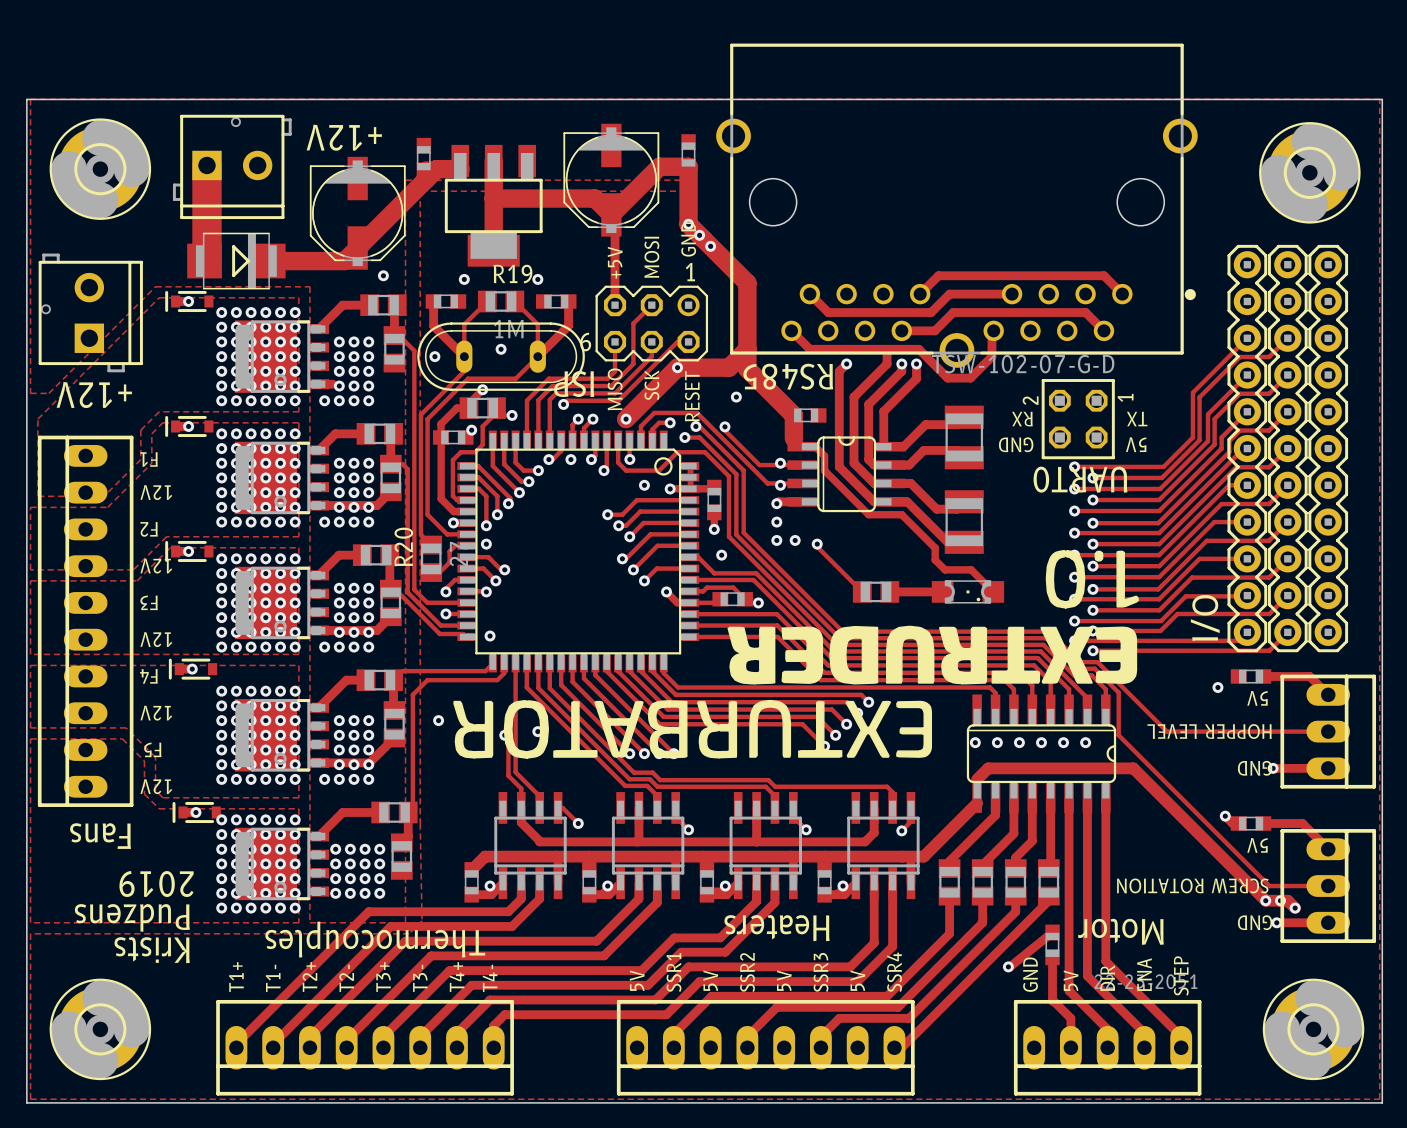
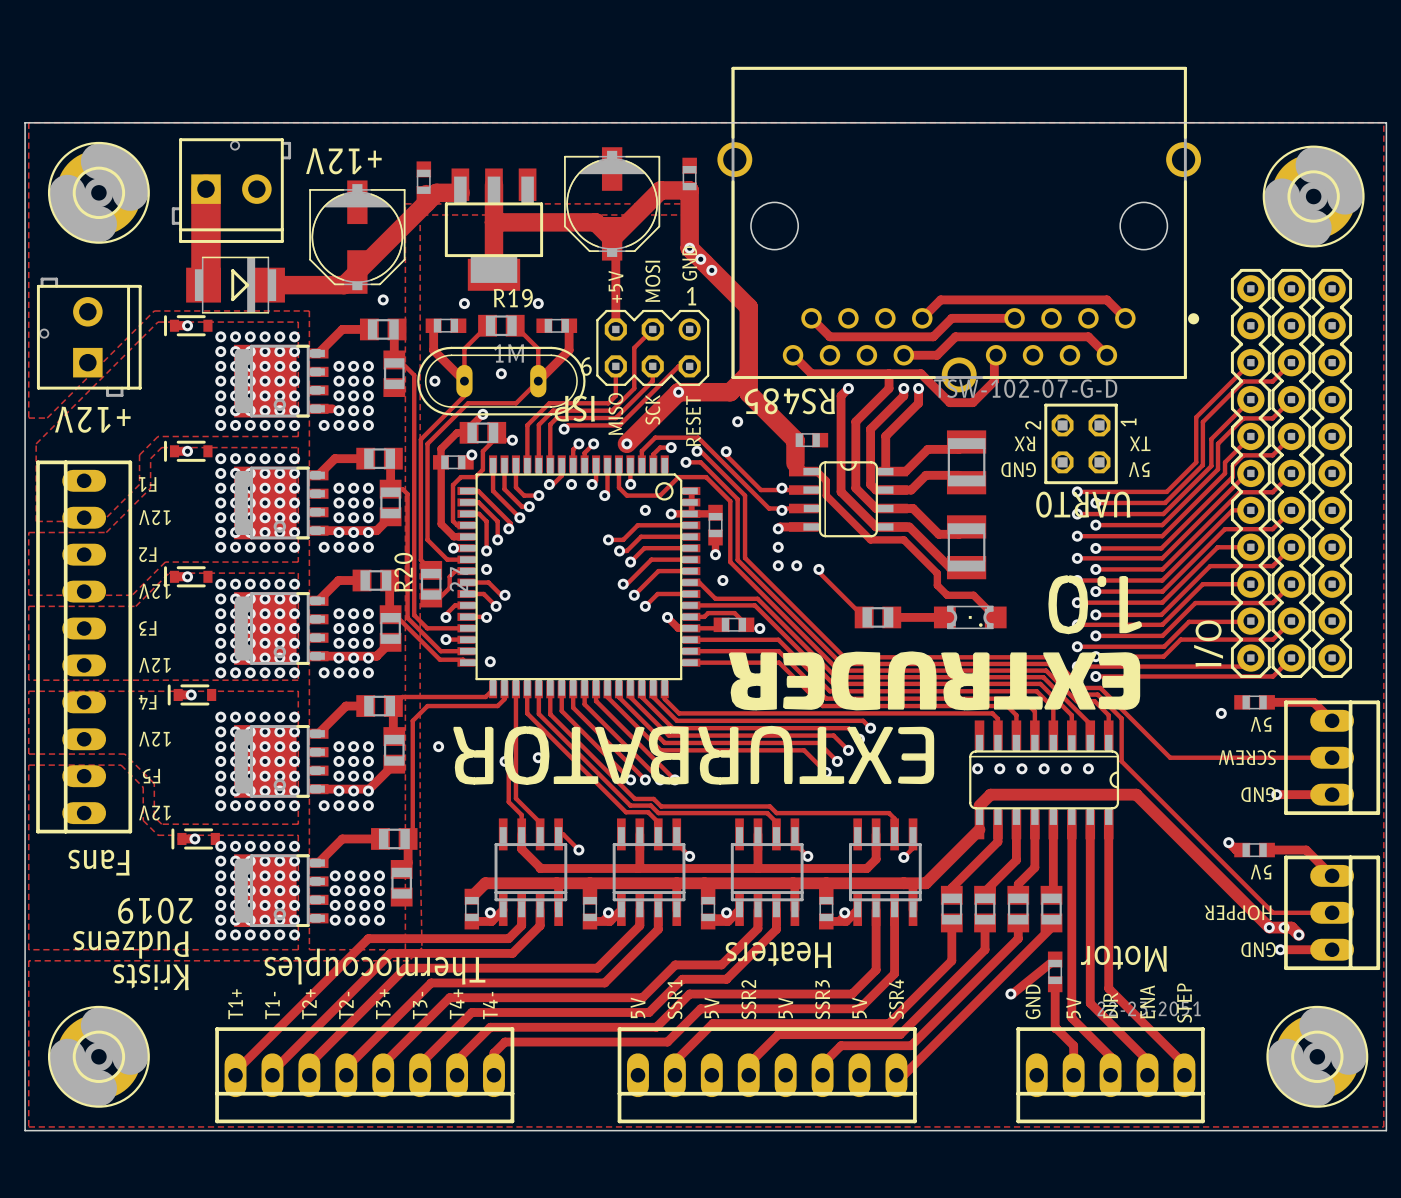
text: HOPPER LEVEL (1209, 731) -> SCREW (1247, 757)
text: SCREW ROTATION (1192, 885) -> HOPPER (1238, 912)

